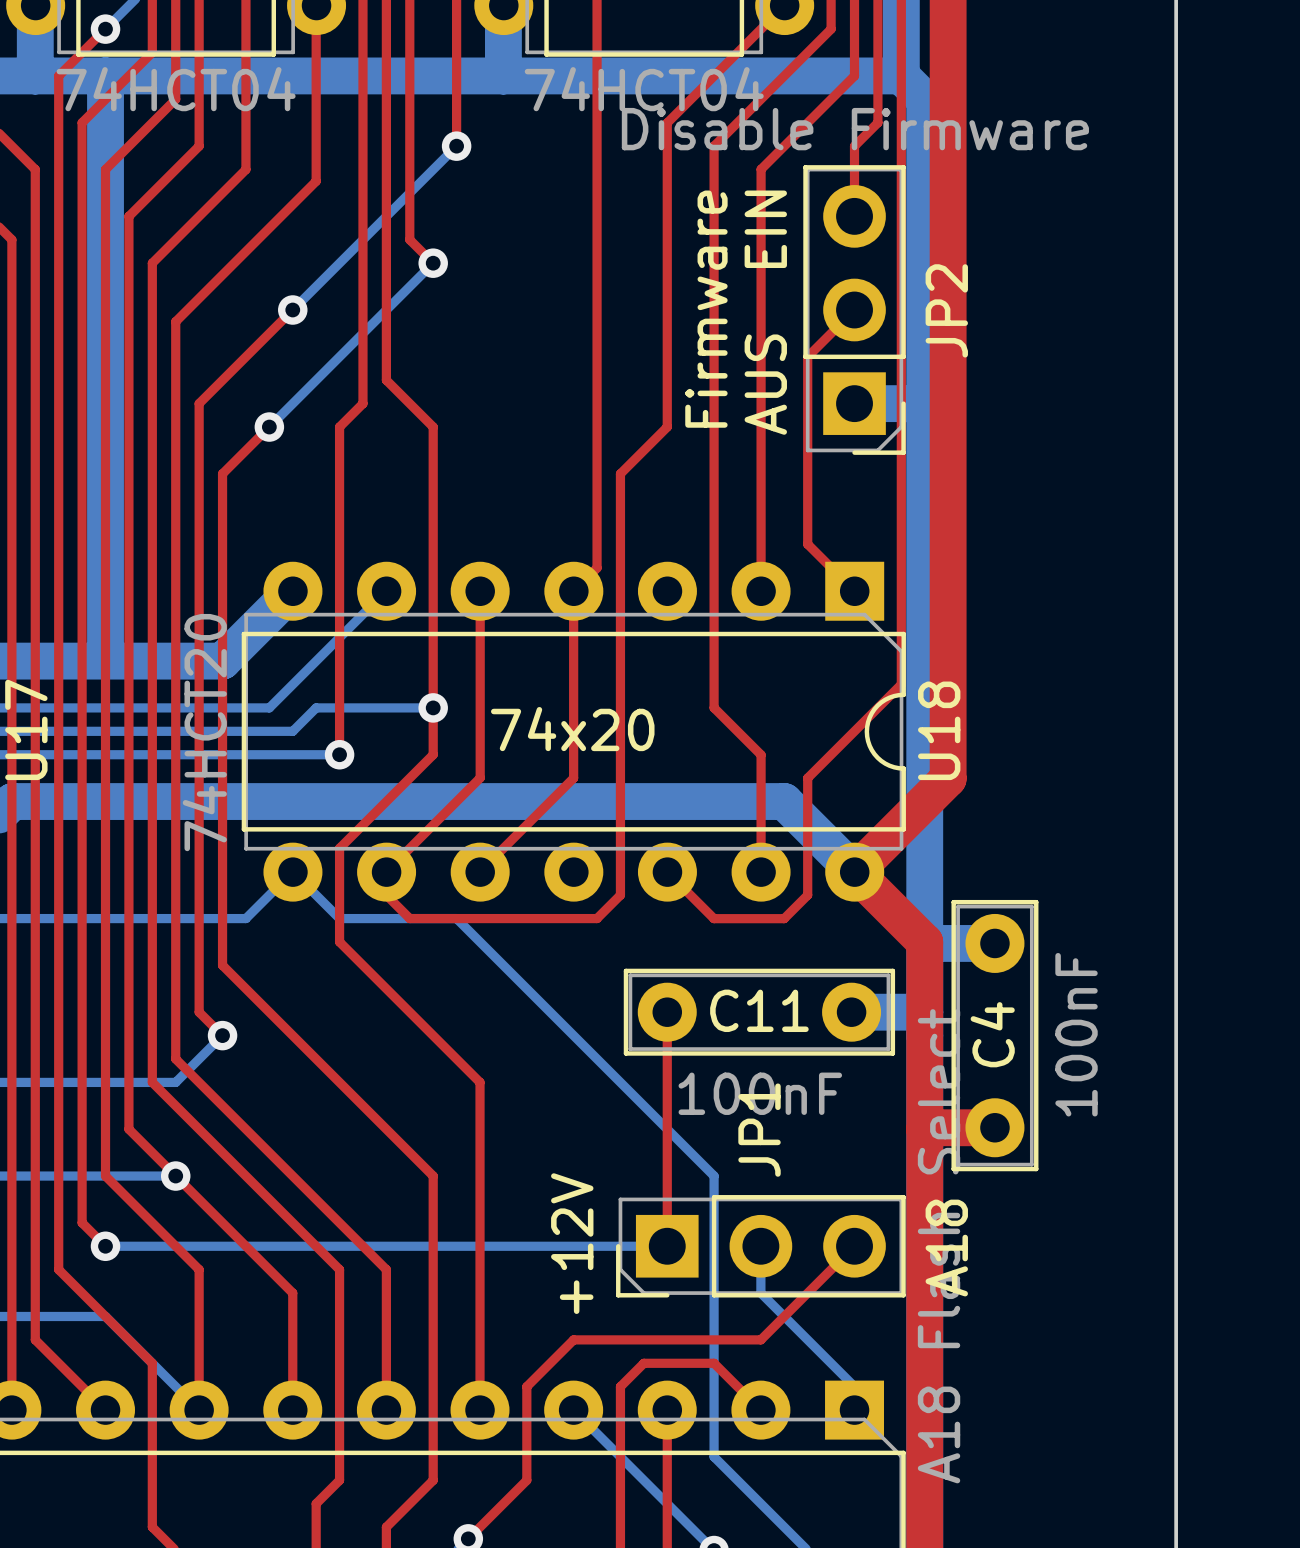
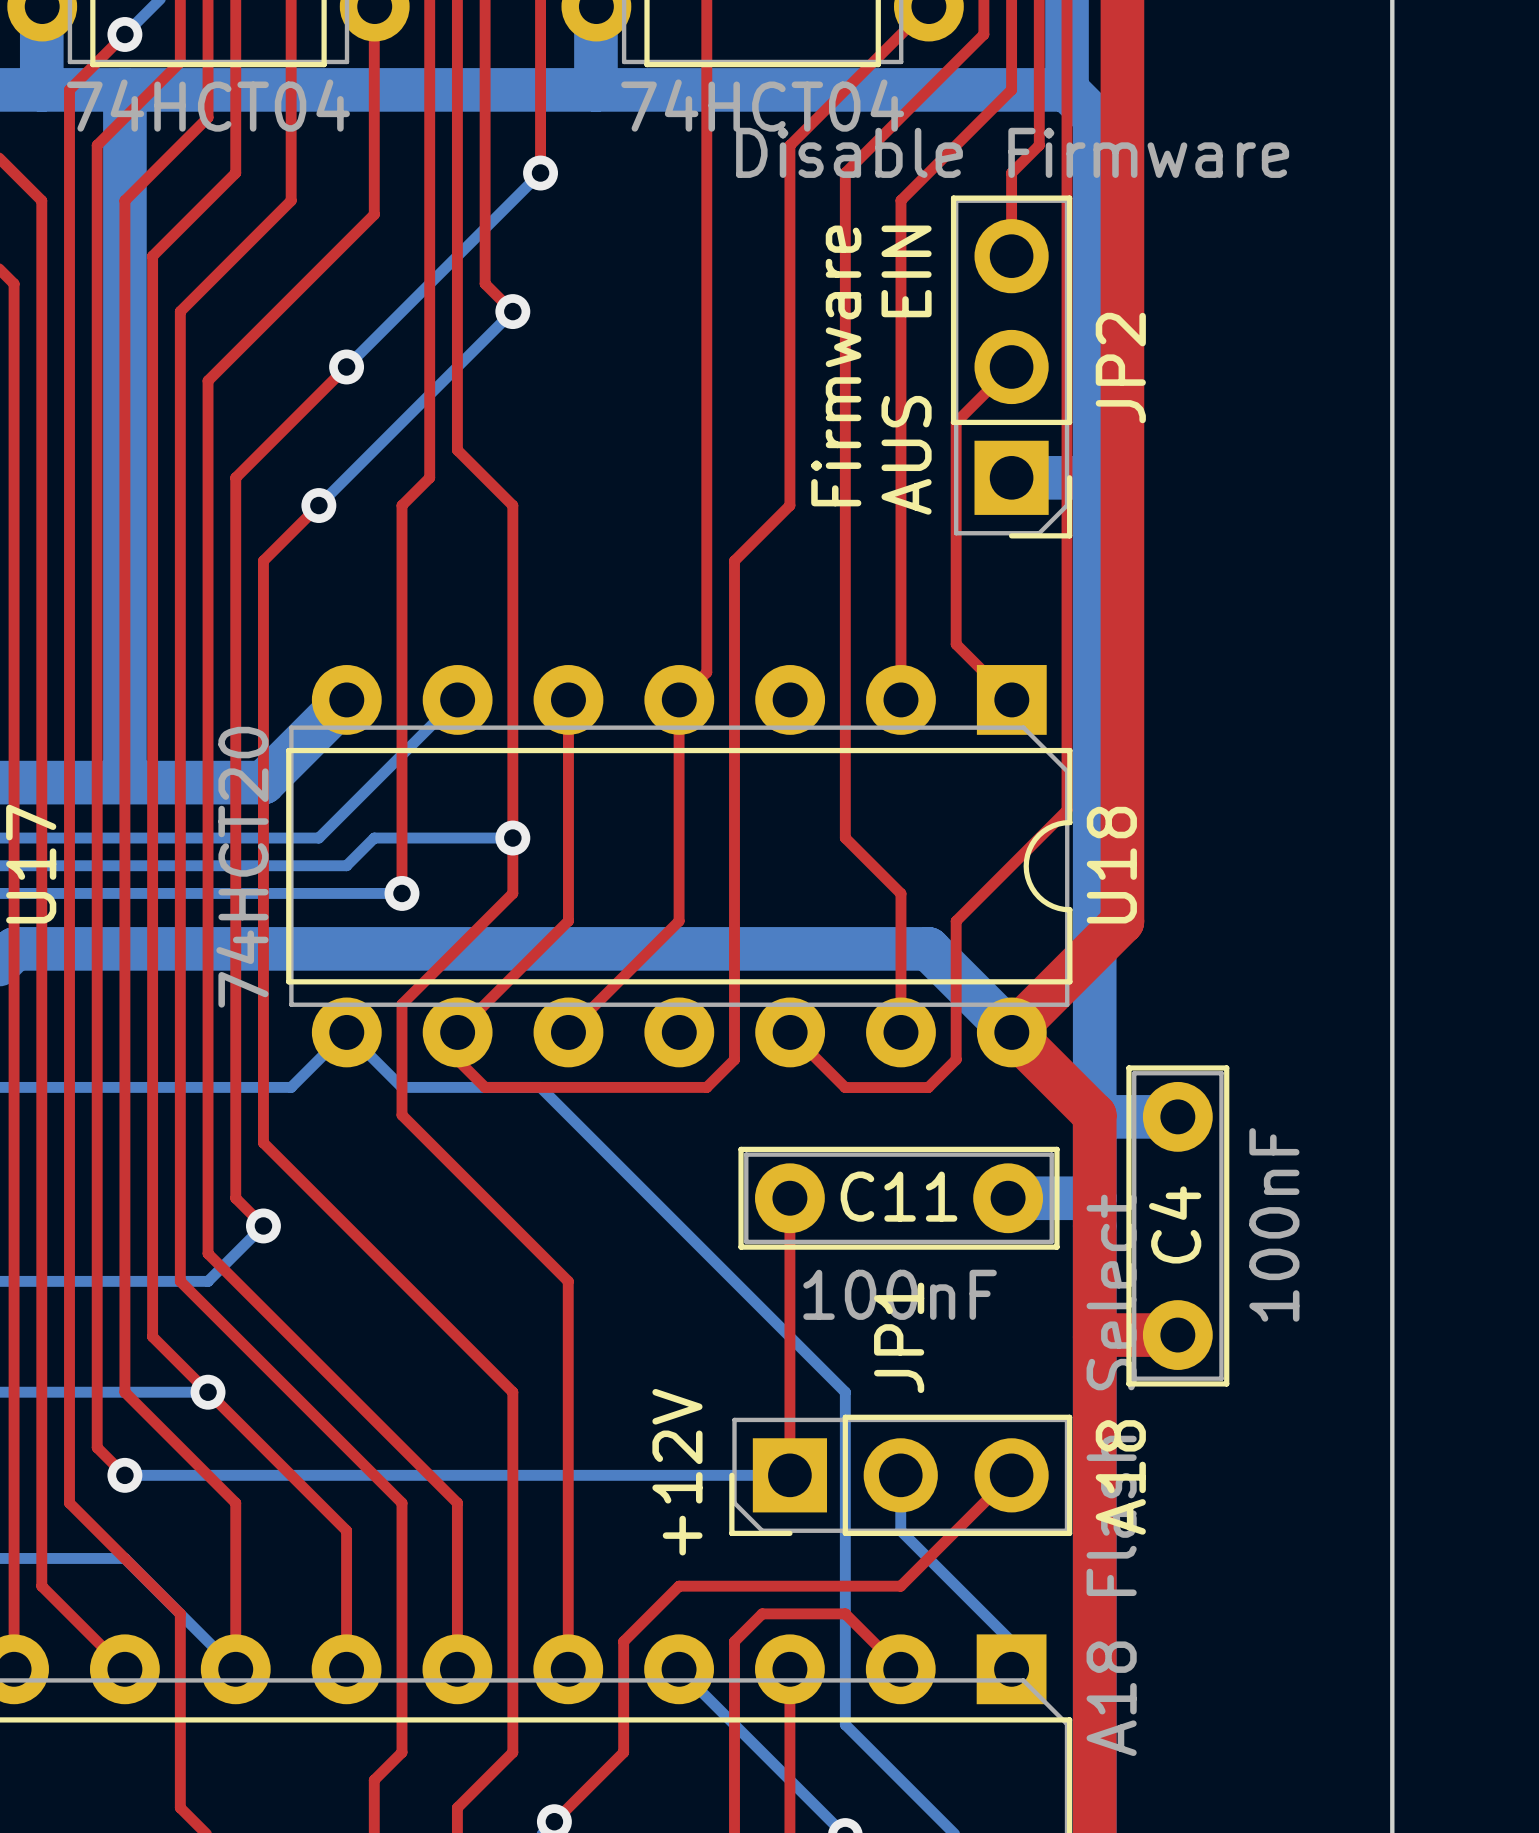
text: 74x20 (572, 729) -> none

